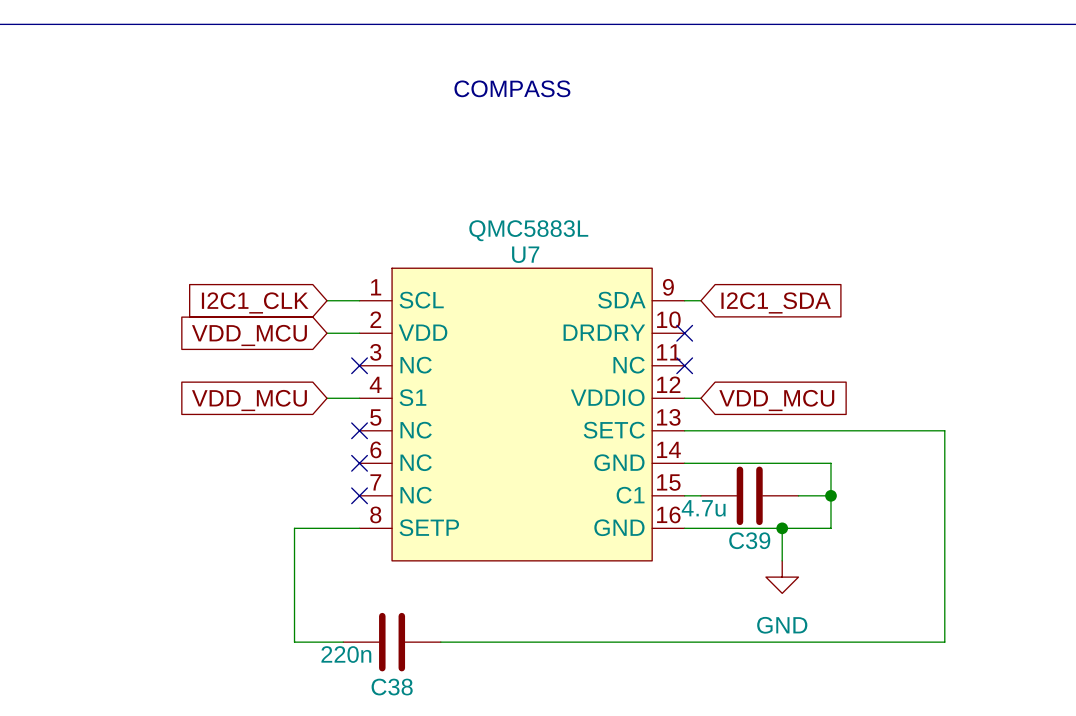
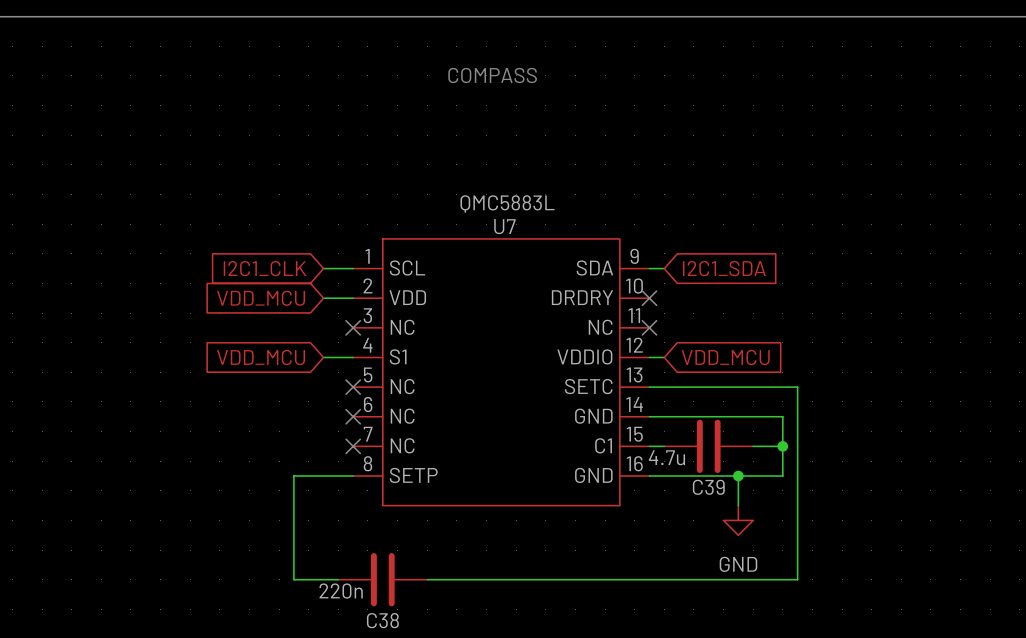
wire: (847, 430) (944, 430) (944, 642) (847, 642) -> (797, 387) (797, 579)

